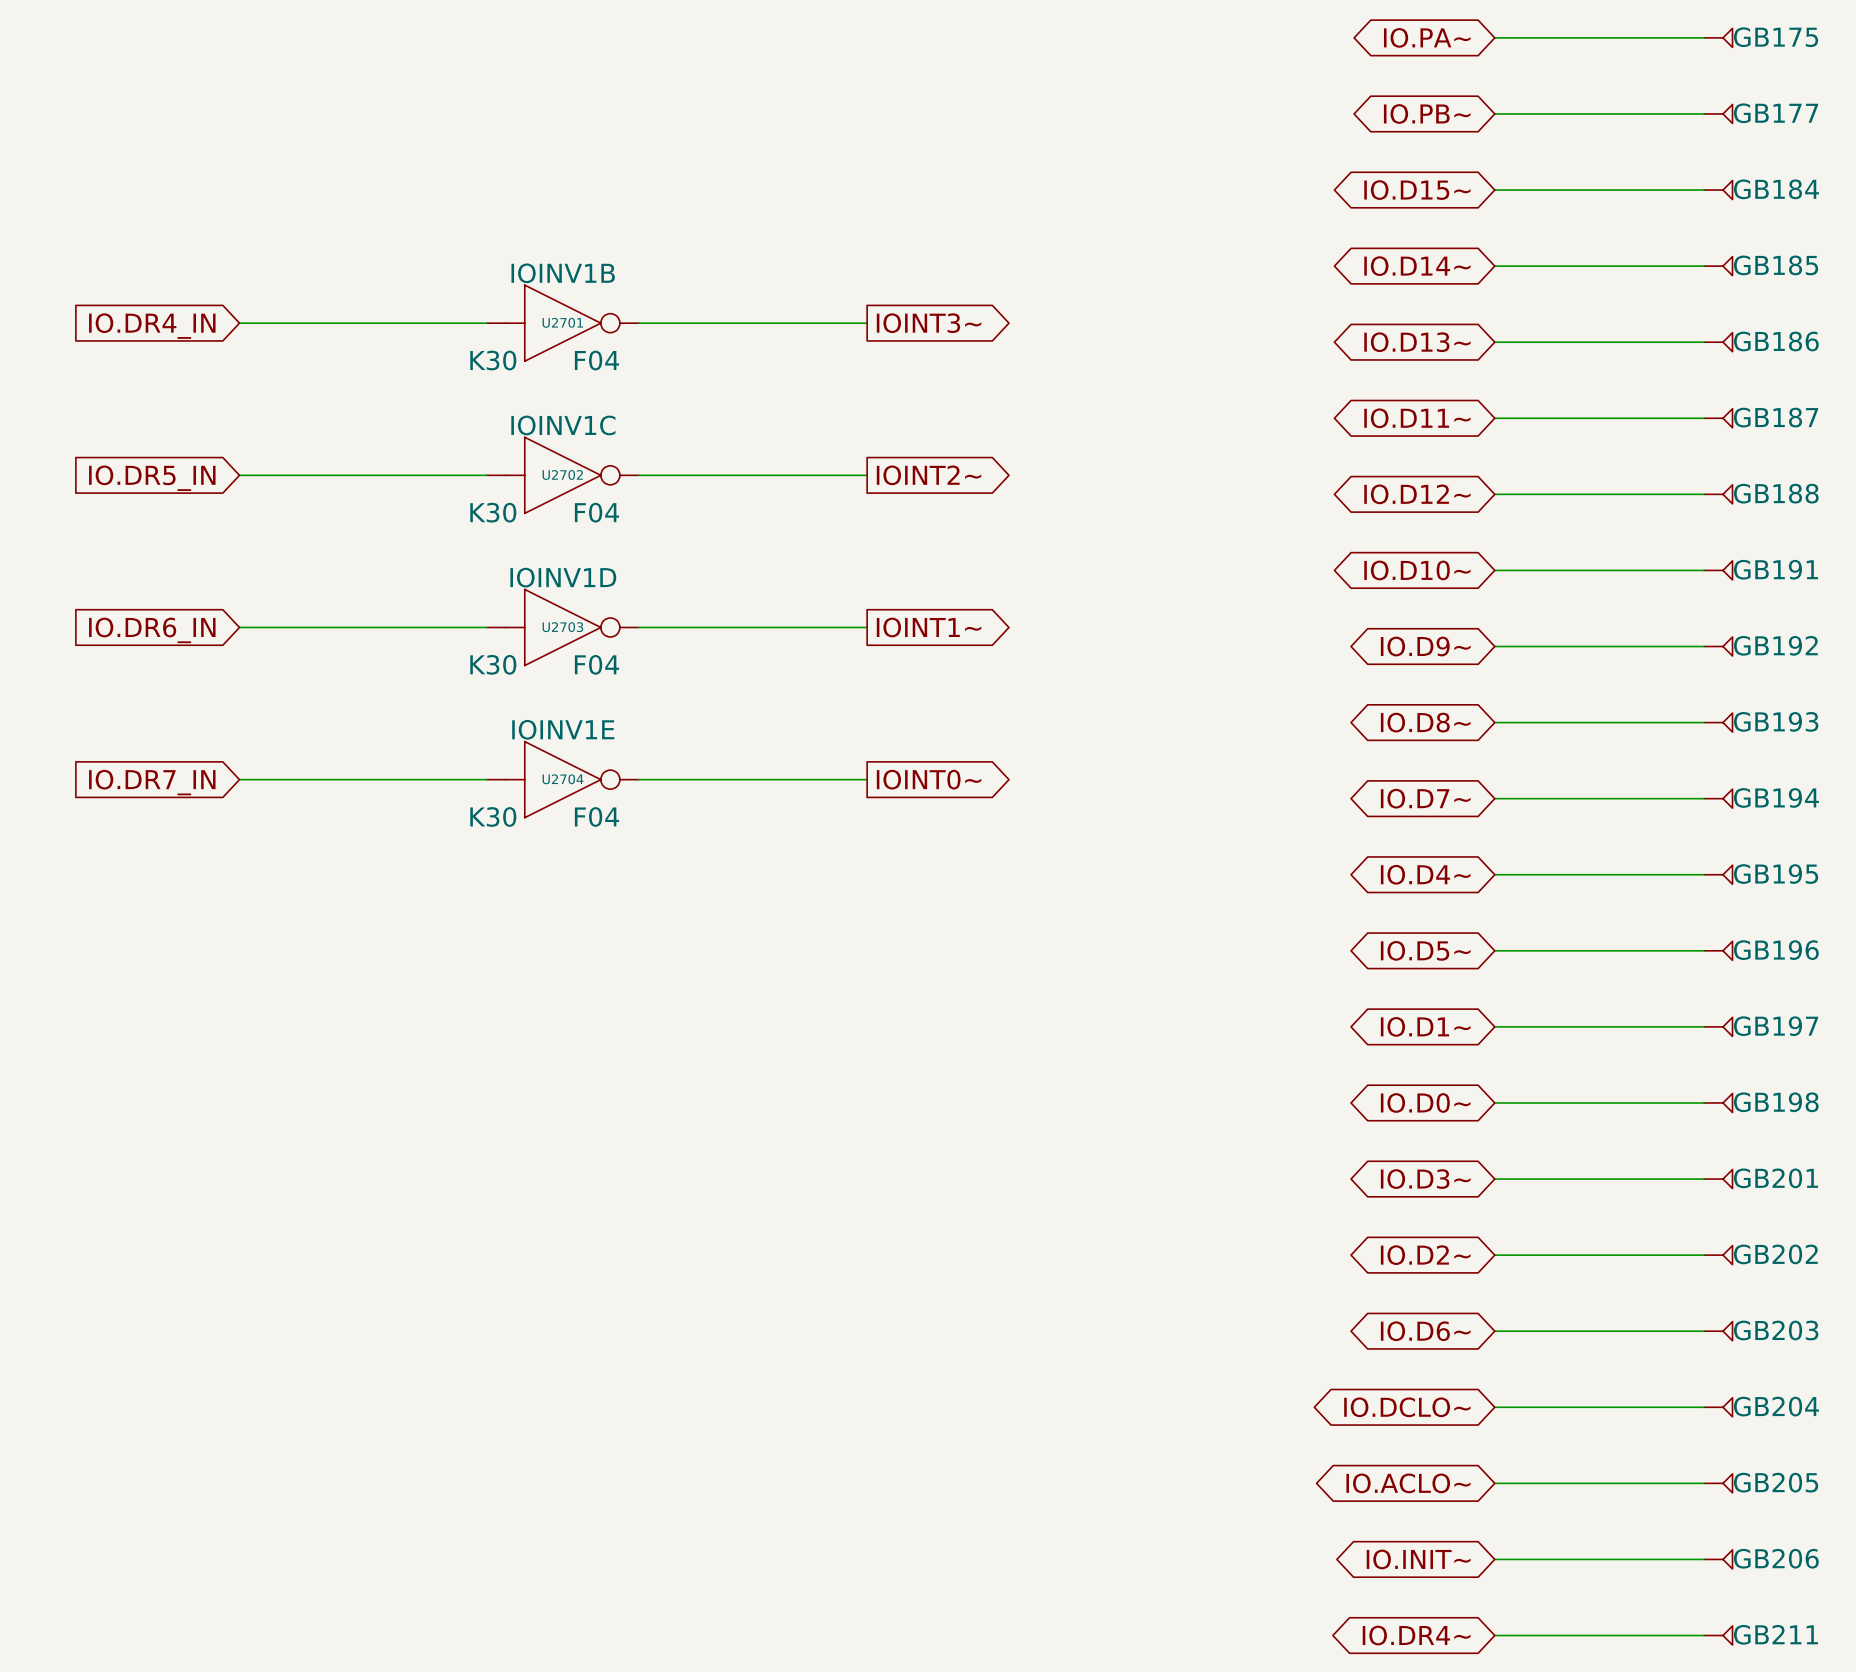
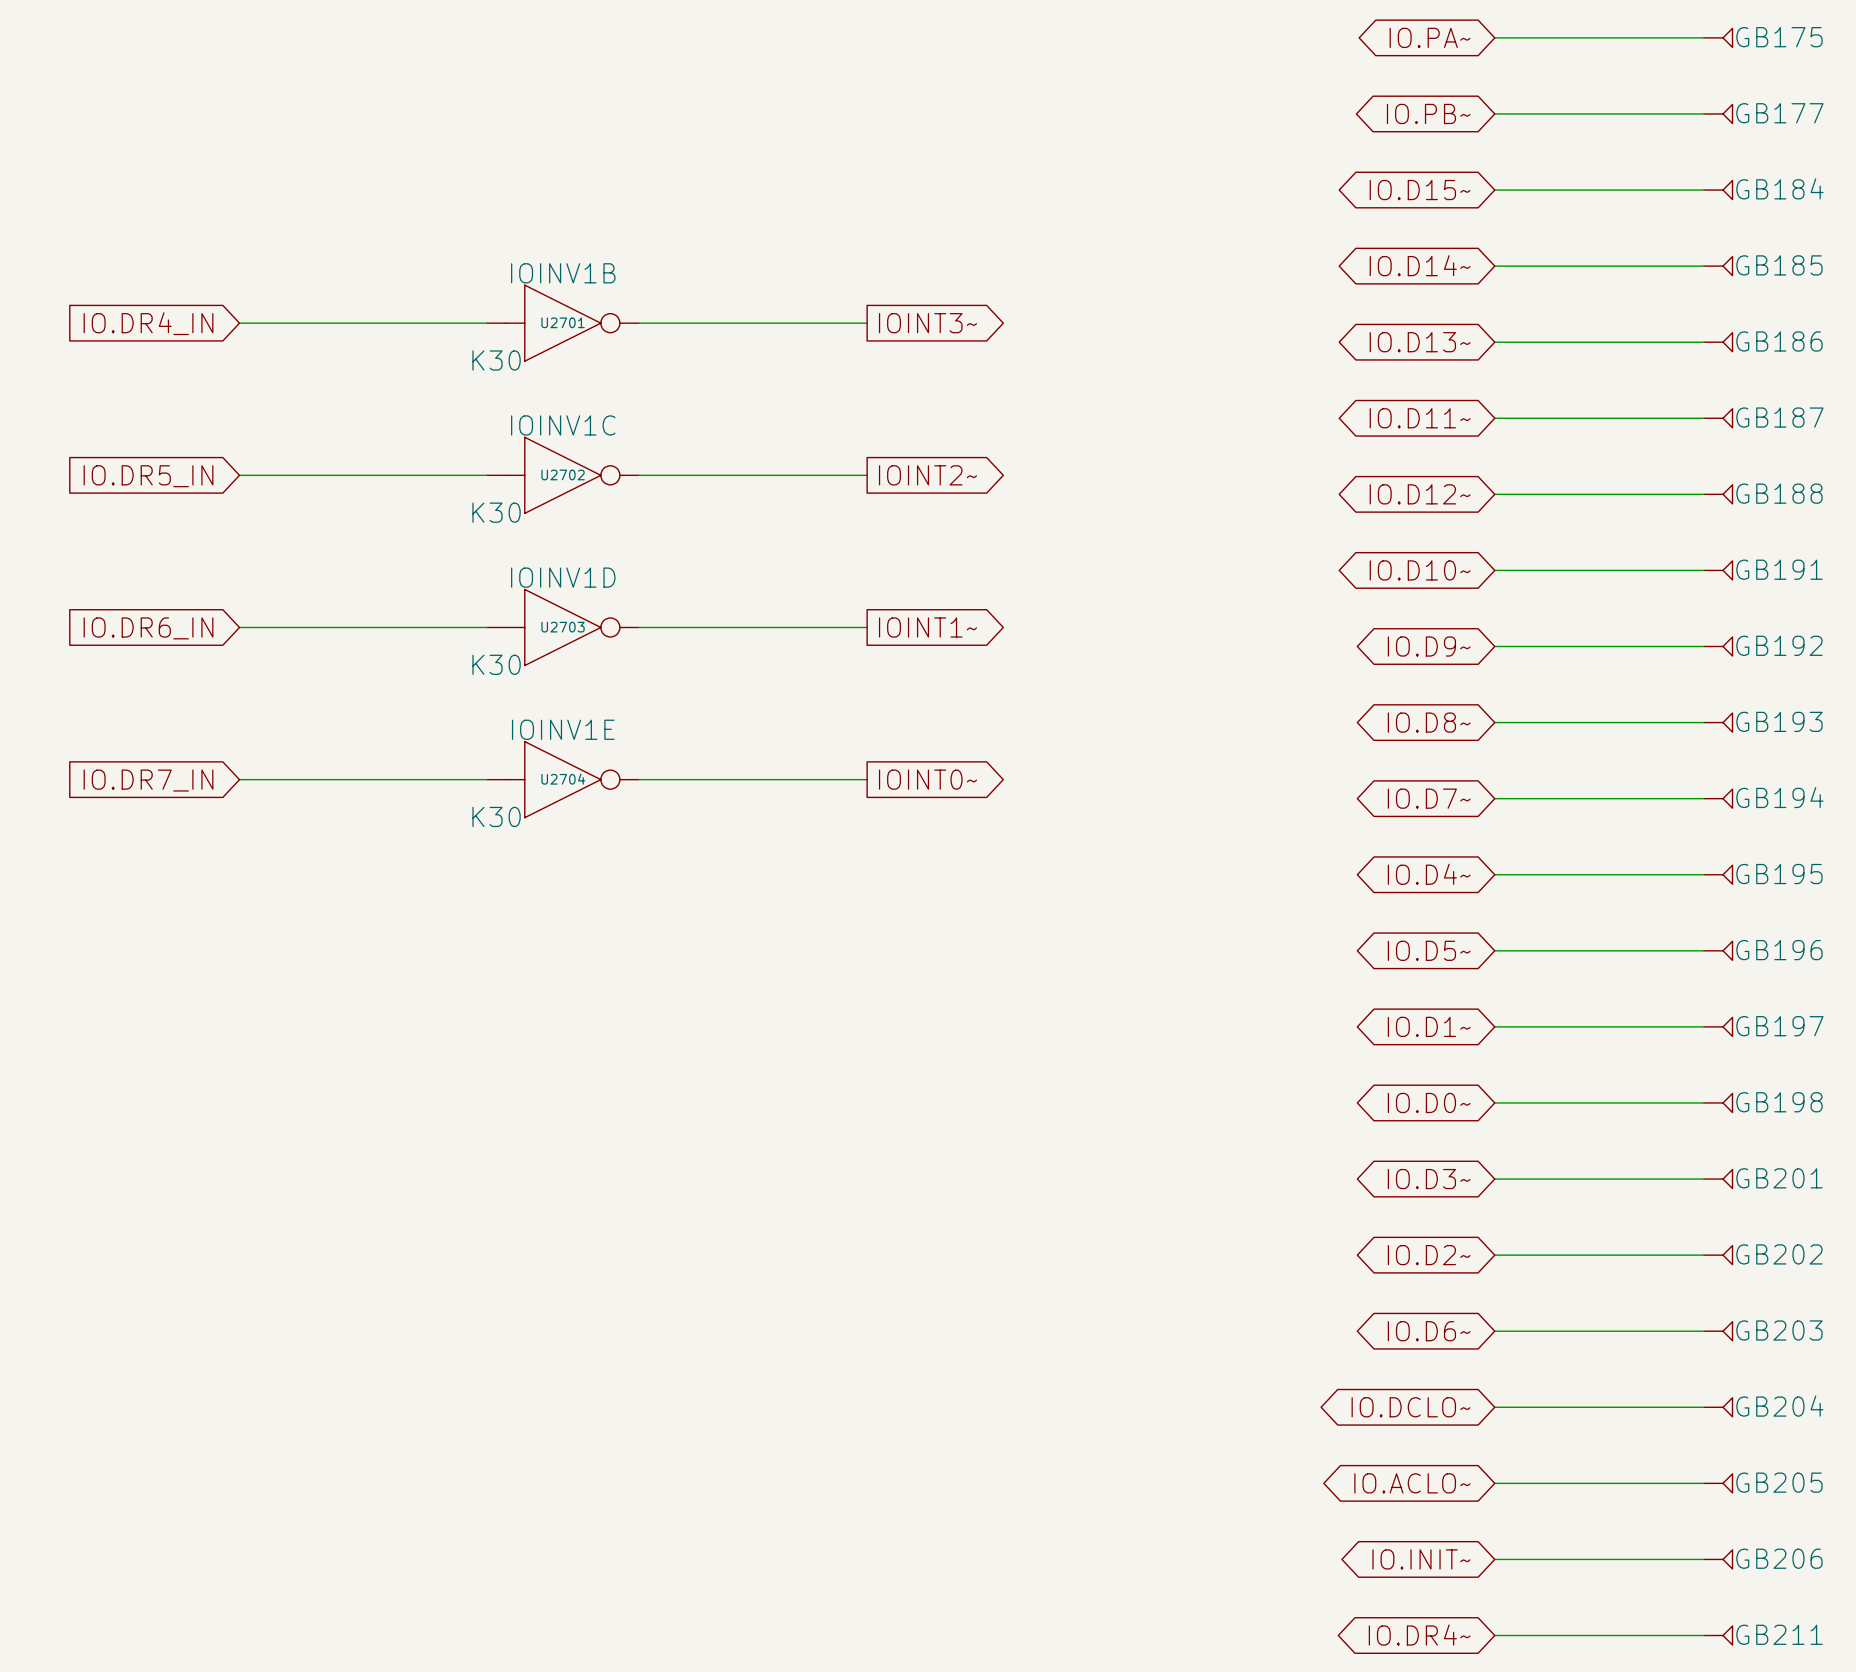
U2701 value: F04 (596, 360) -> none
U2702 value: F04 (596, 512) -> none
U2703 value: F04 (596, 664) -> none
U2704 value: F04 (596, 816) -> none

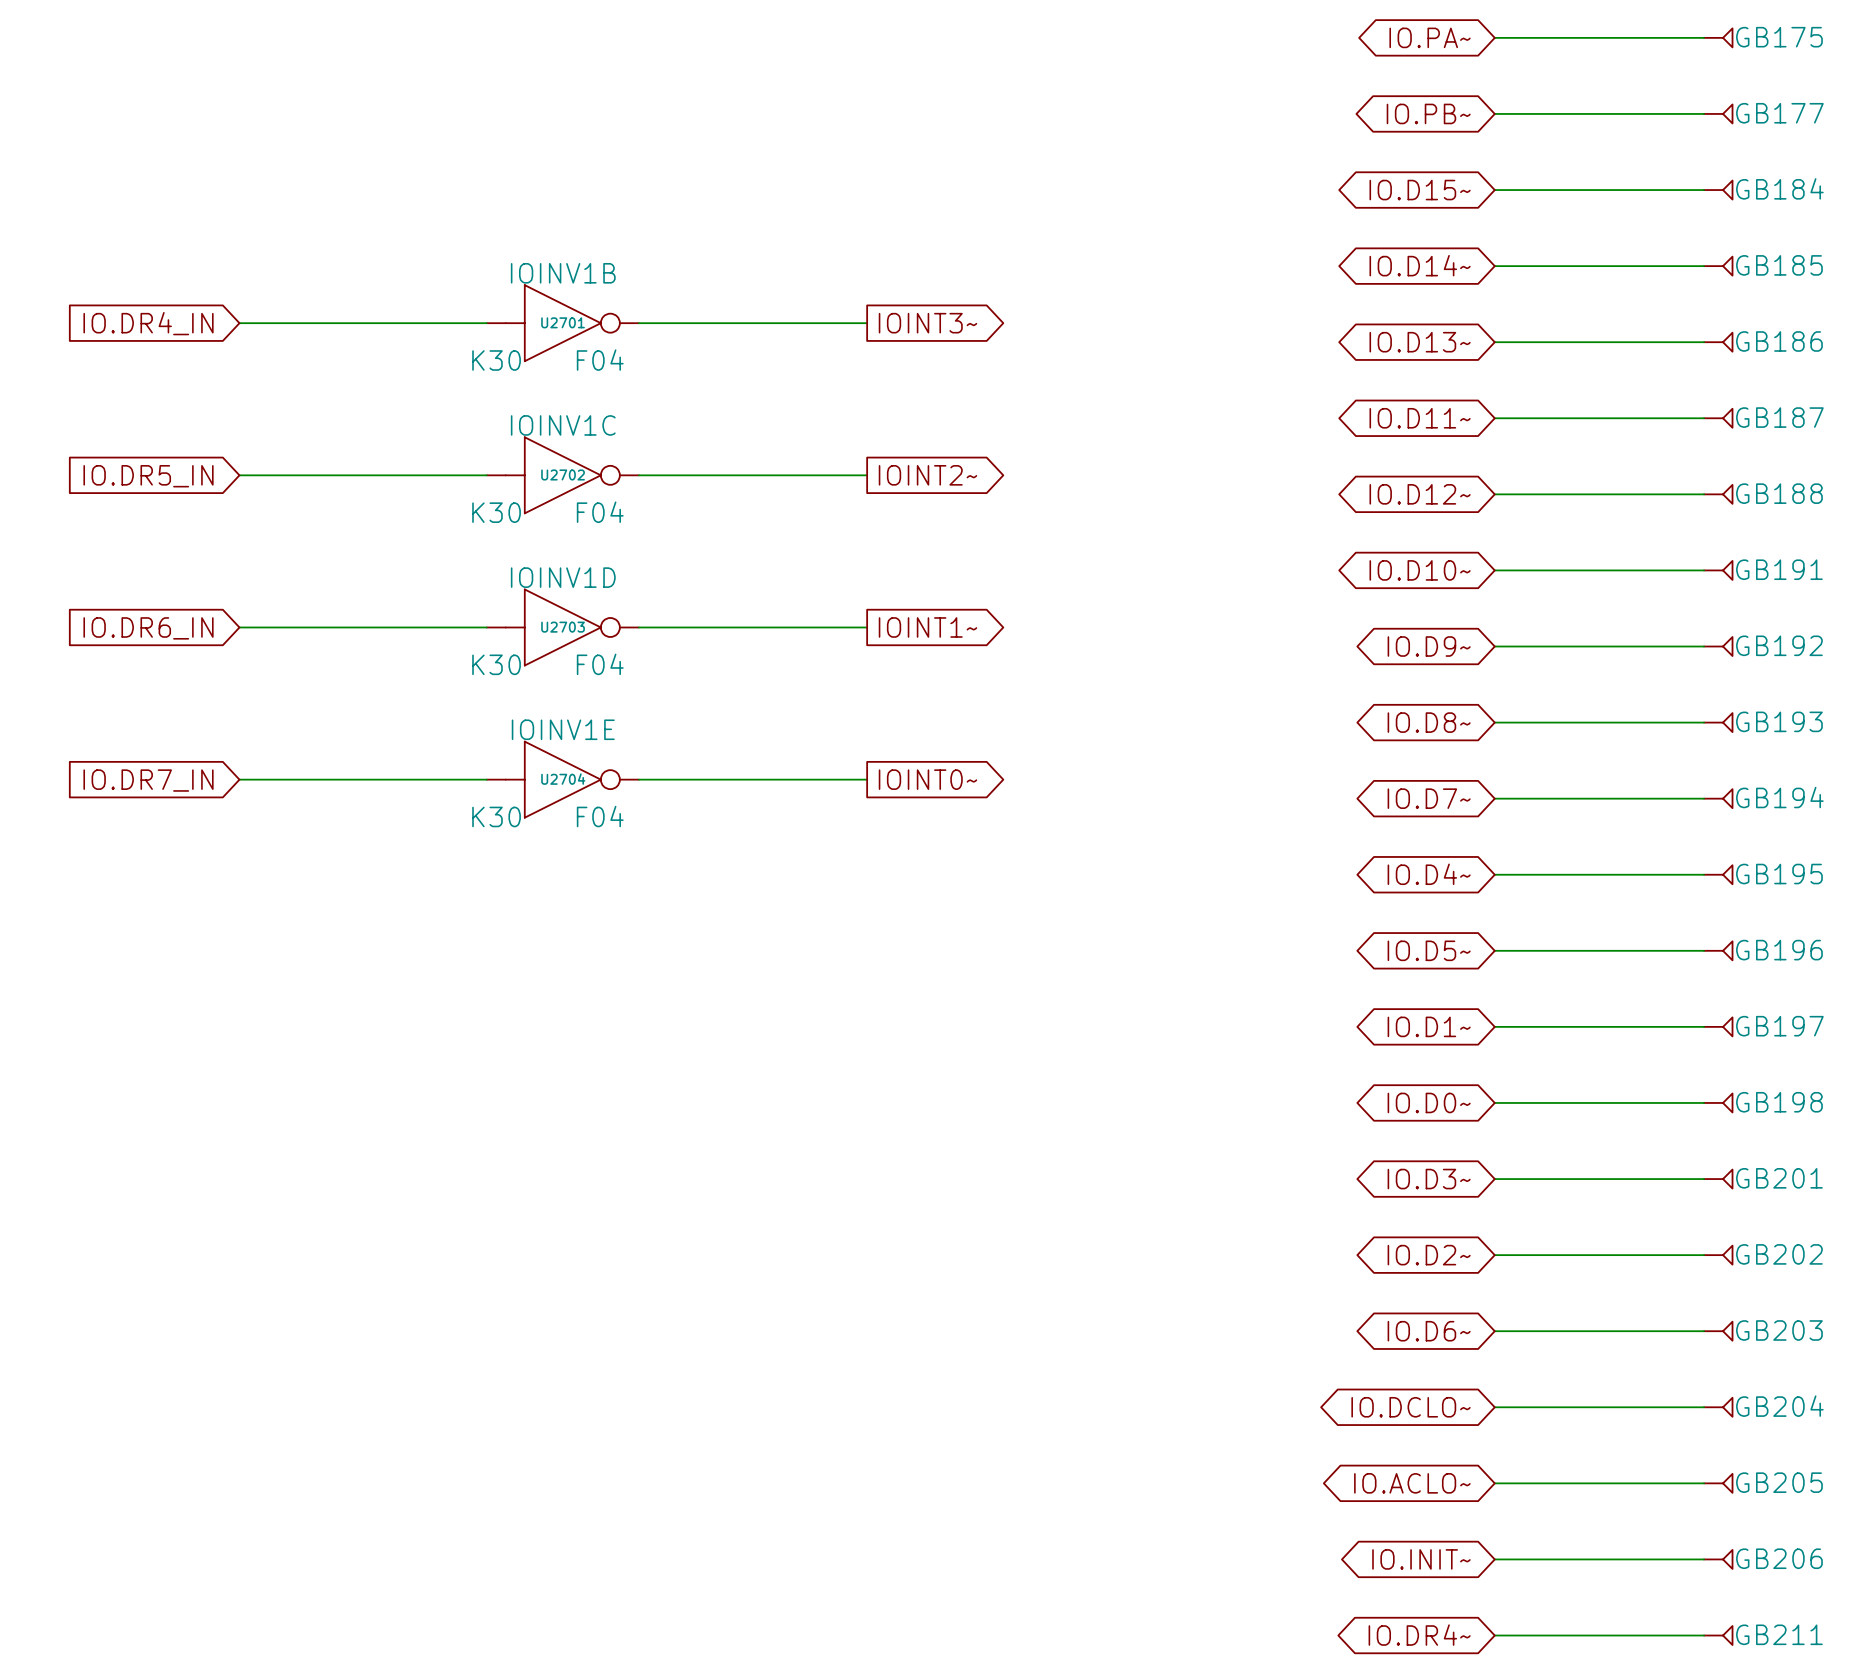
U2701 value: none -> F04 (600, 360)
U2702 value: none -> F04 (600, 512)
U2703 value: none -> F04 (600, 664)
U2704 value: none -> F04 (600, 816)

